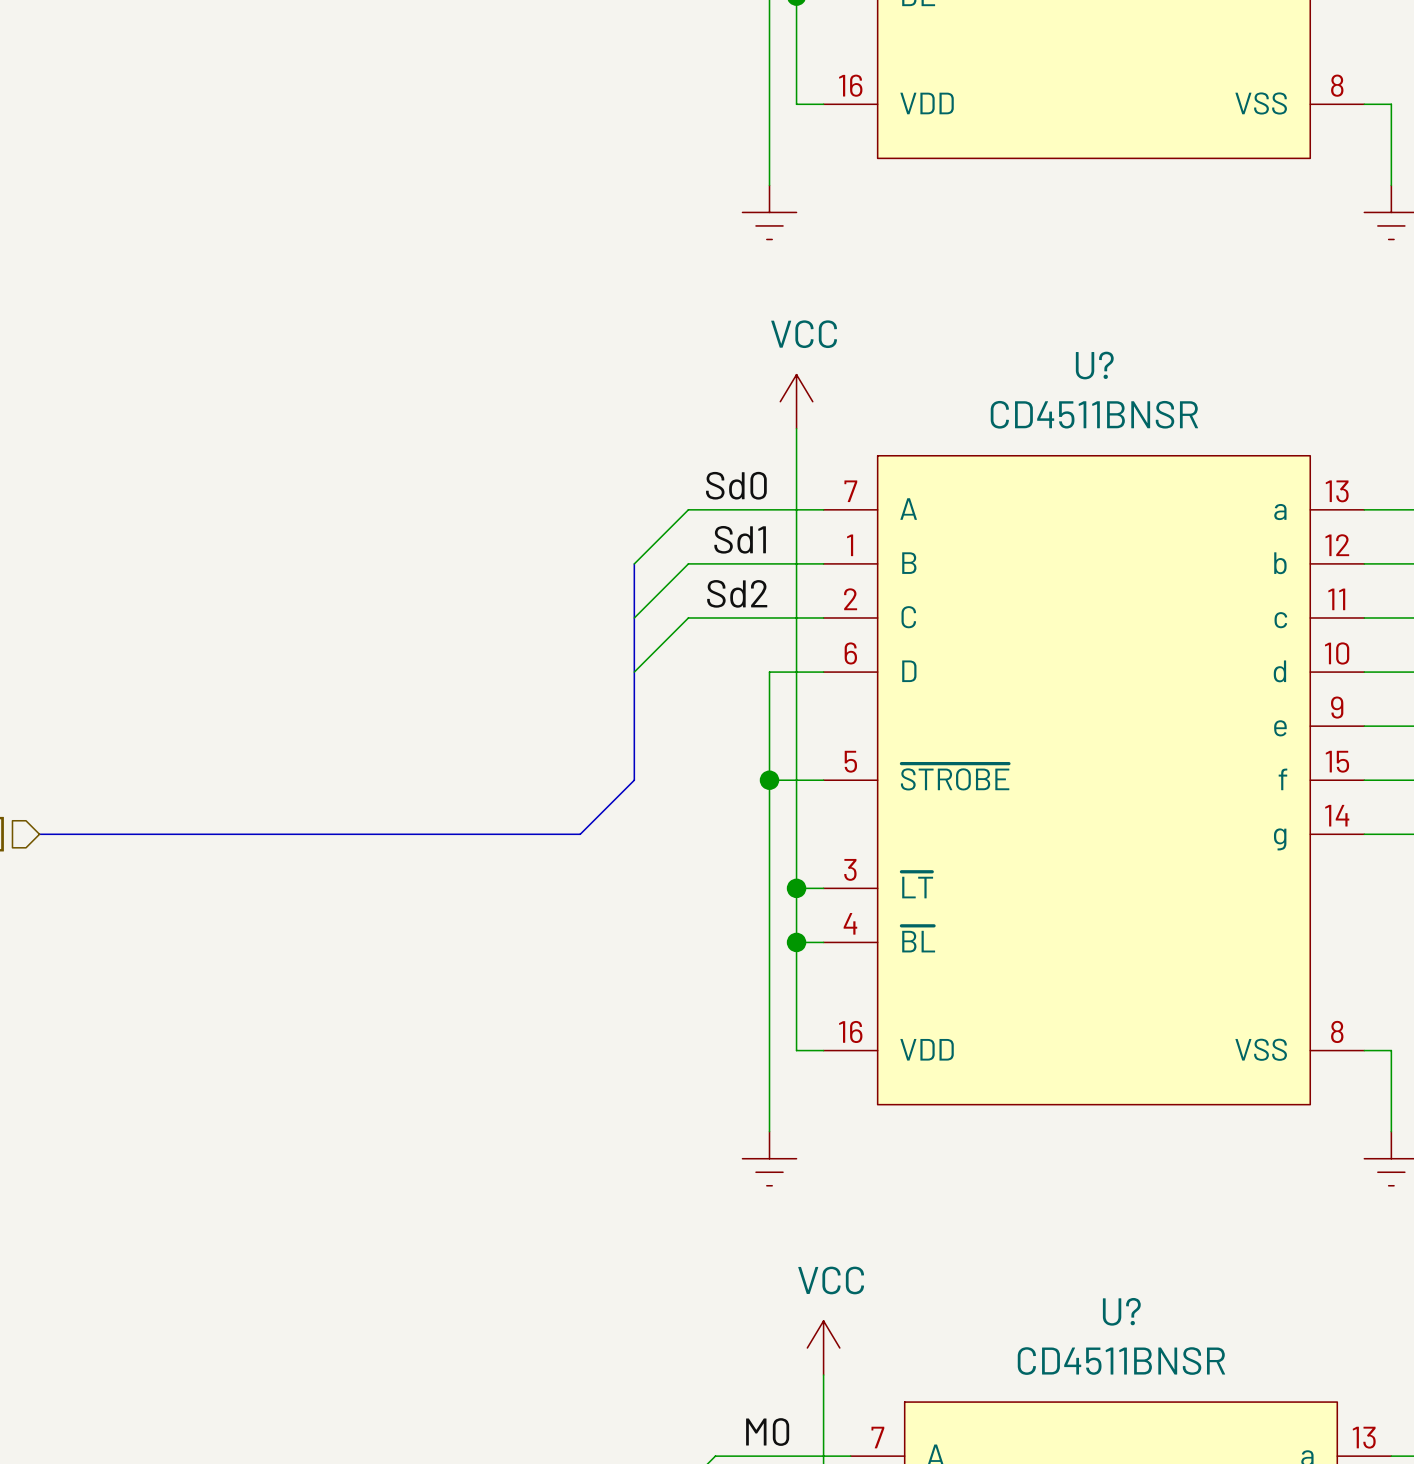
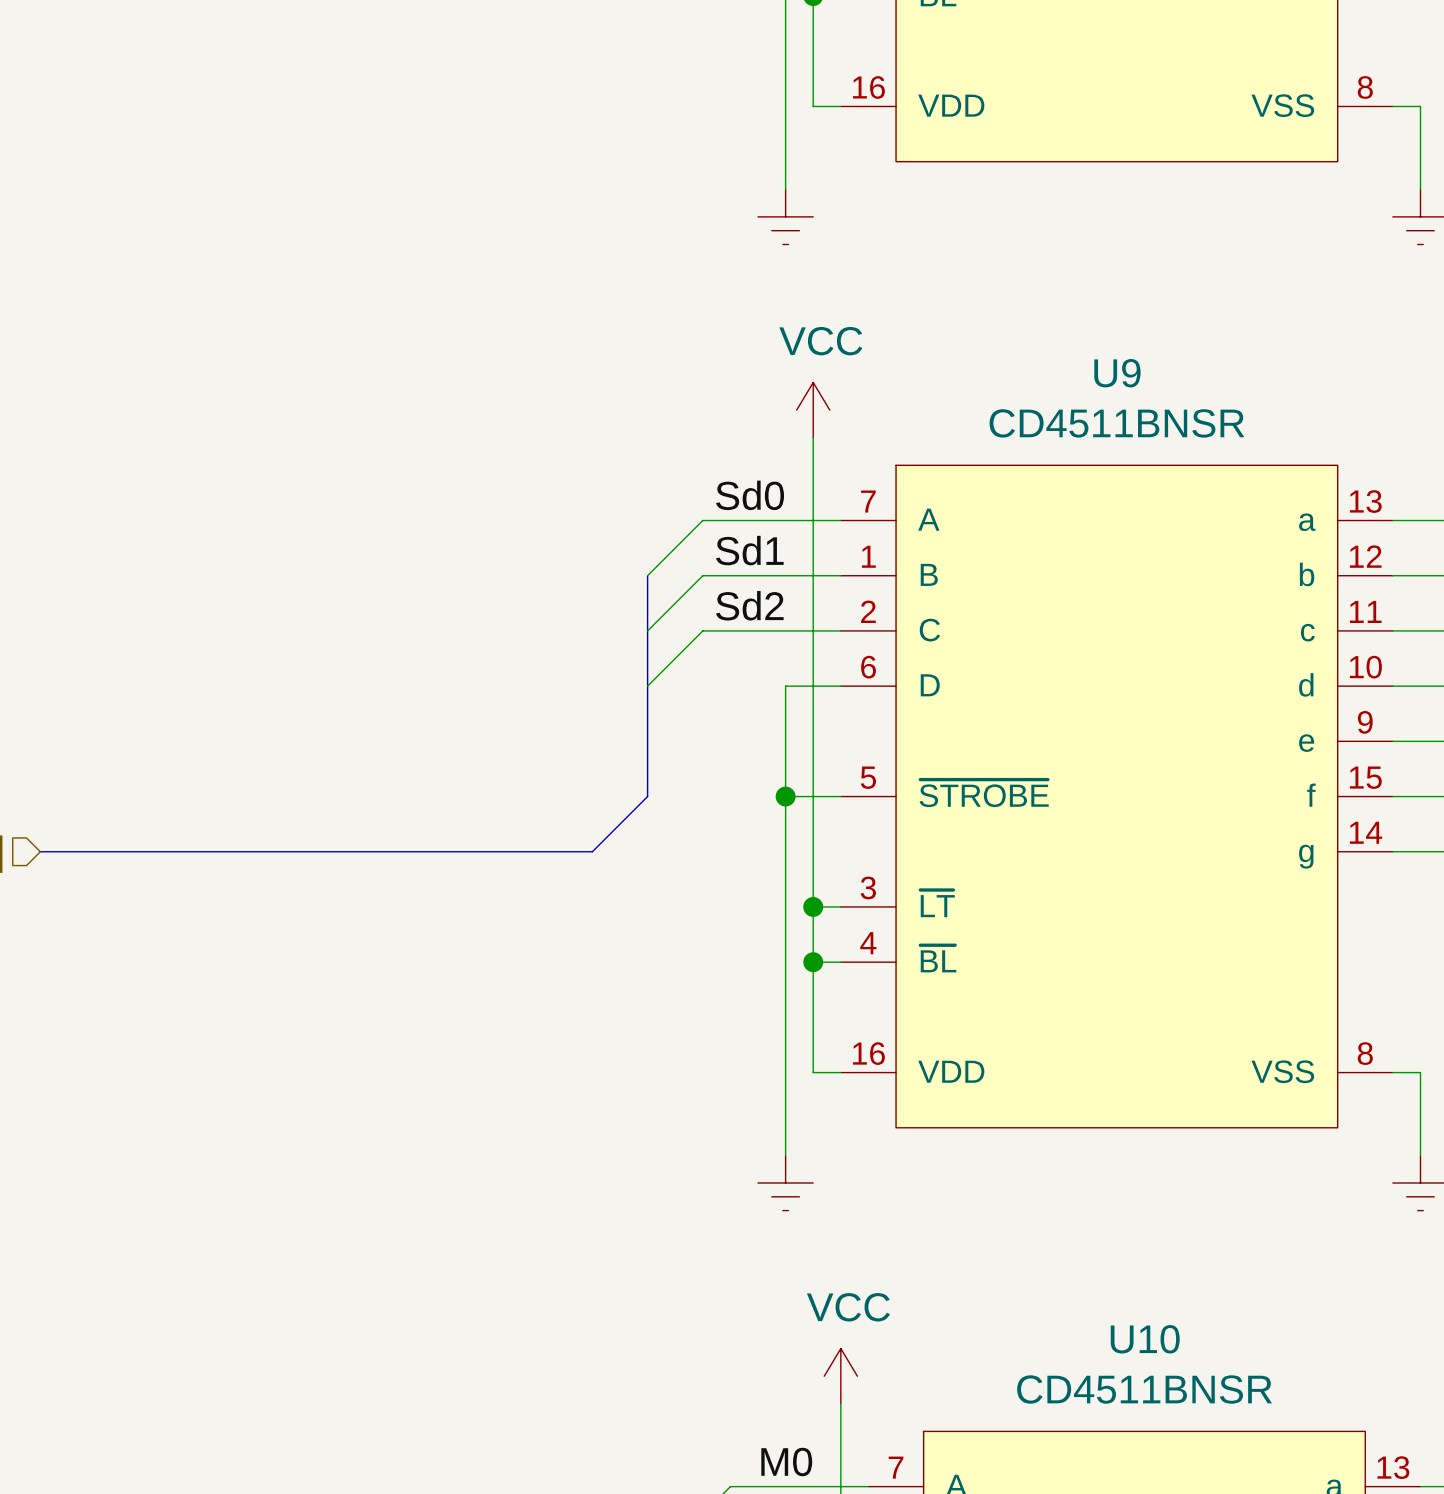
U? name: U? (1094, 365) -> U9 (1117, 373)
U? name: U? (1121, 1311) -> U10 (1145, 1339)

